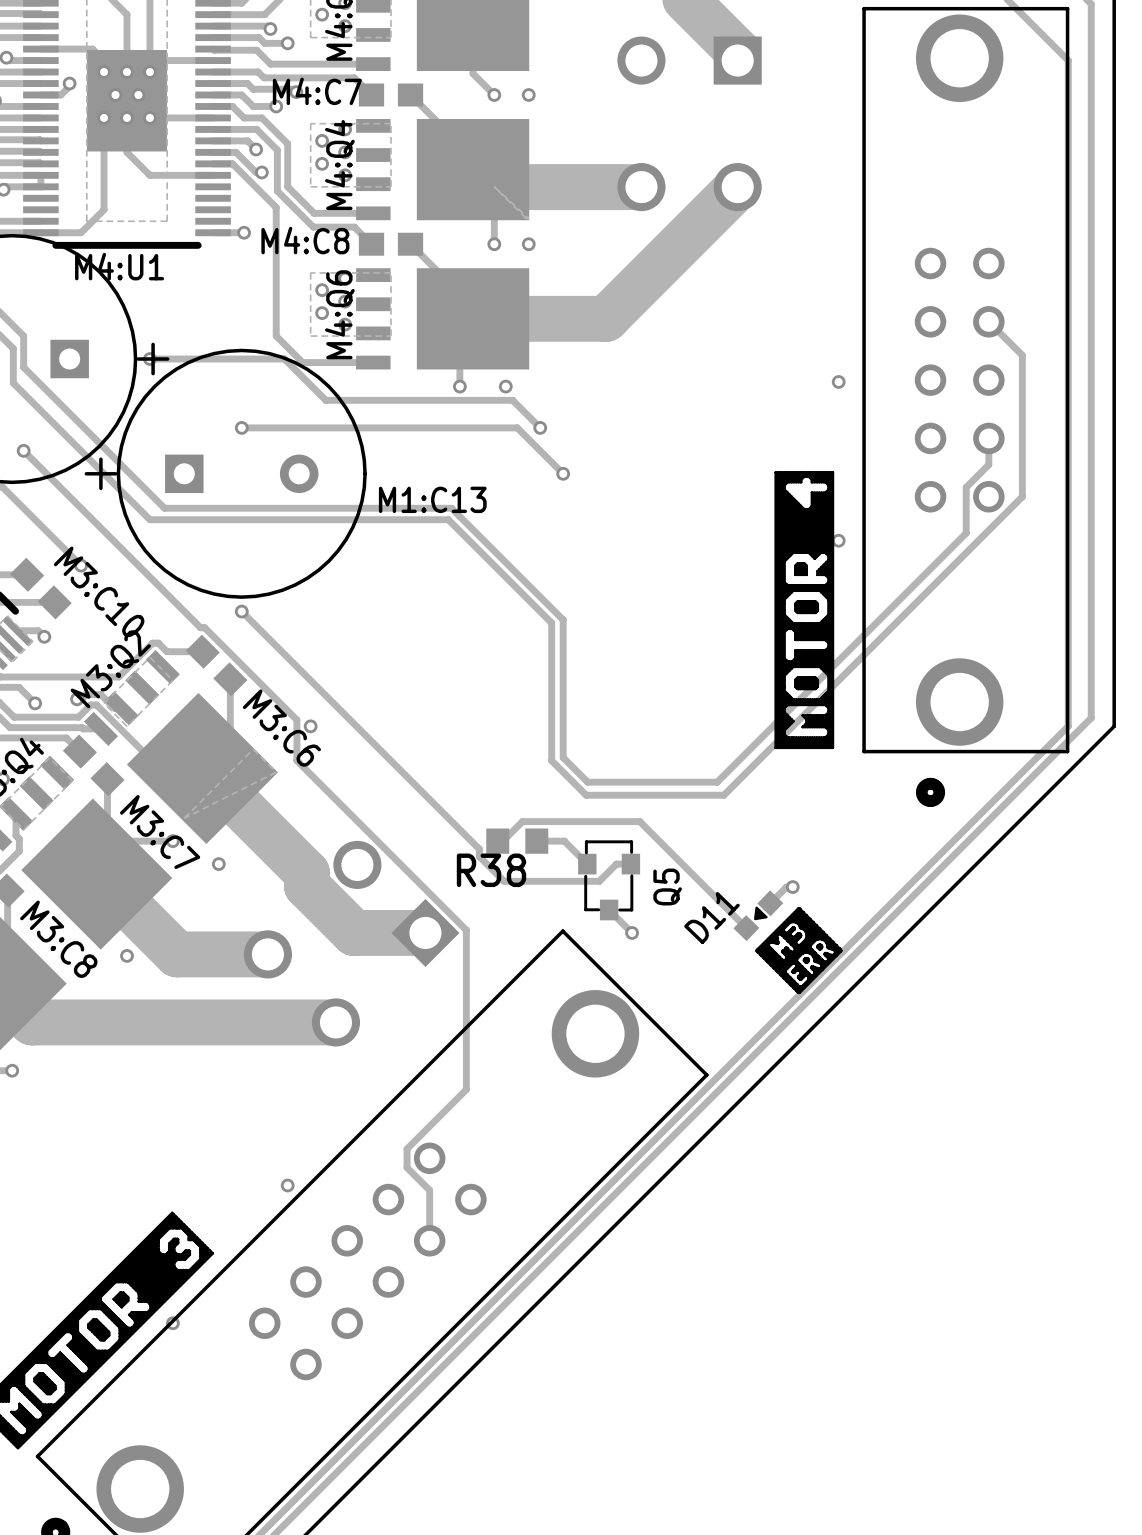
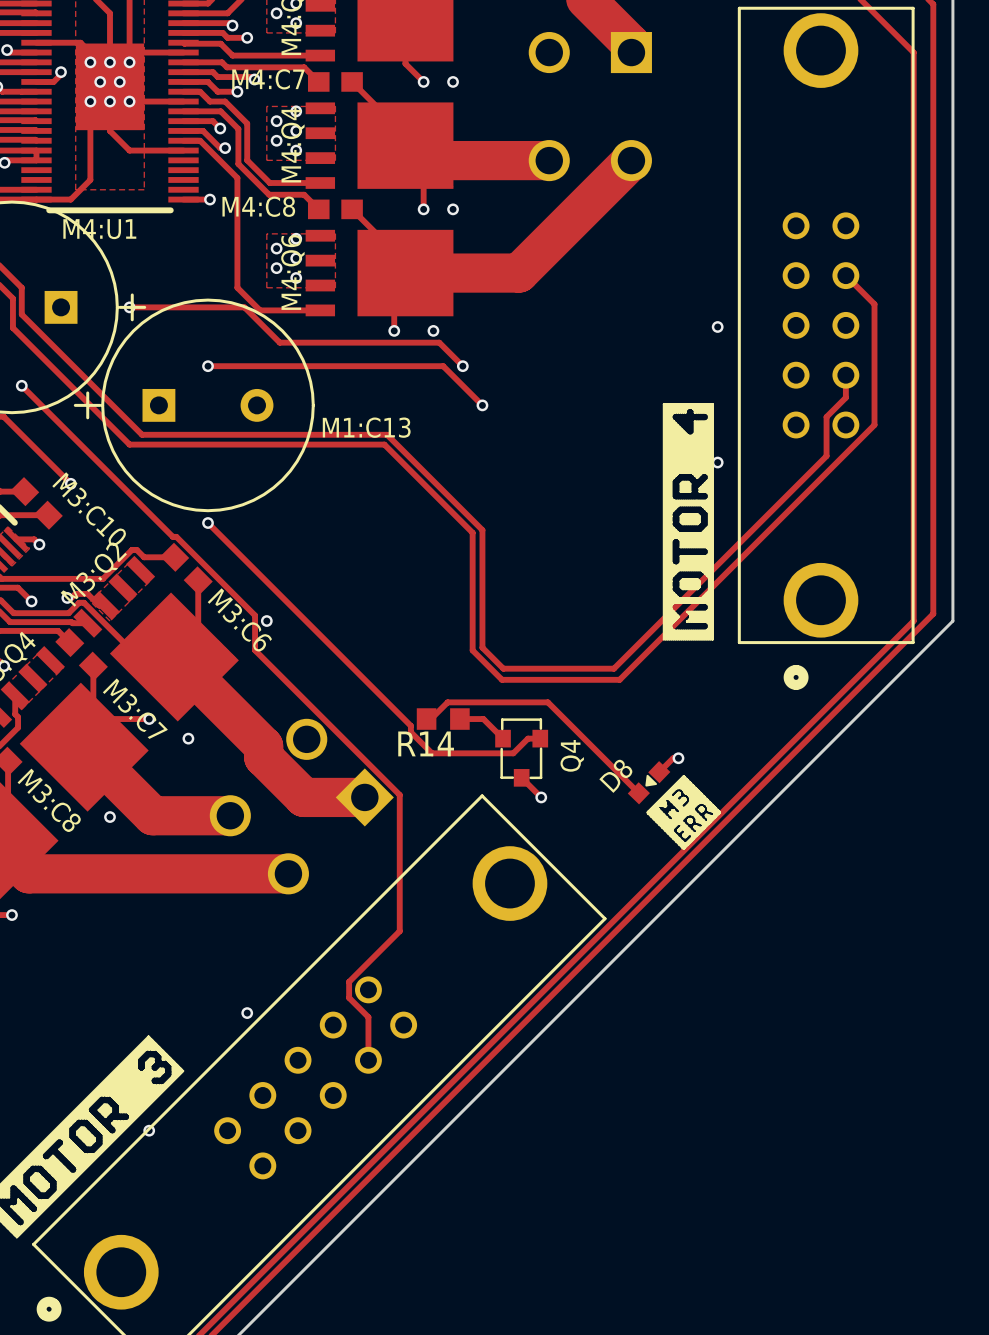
R38 name: R38 (491, 870) -> R14 (426, 743)
Q5 name: Q5 (667, 887) -> Q4 (572, 755)
D11 name: D11 (711, 917) -> D8 (615, 776)

